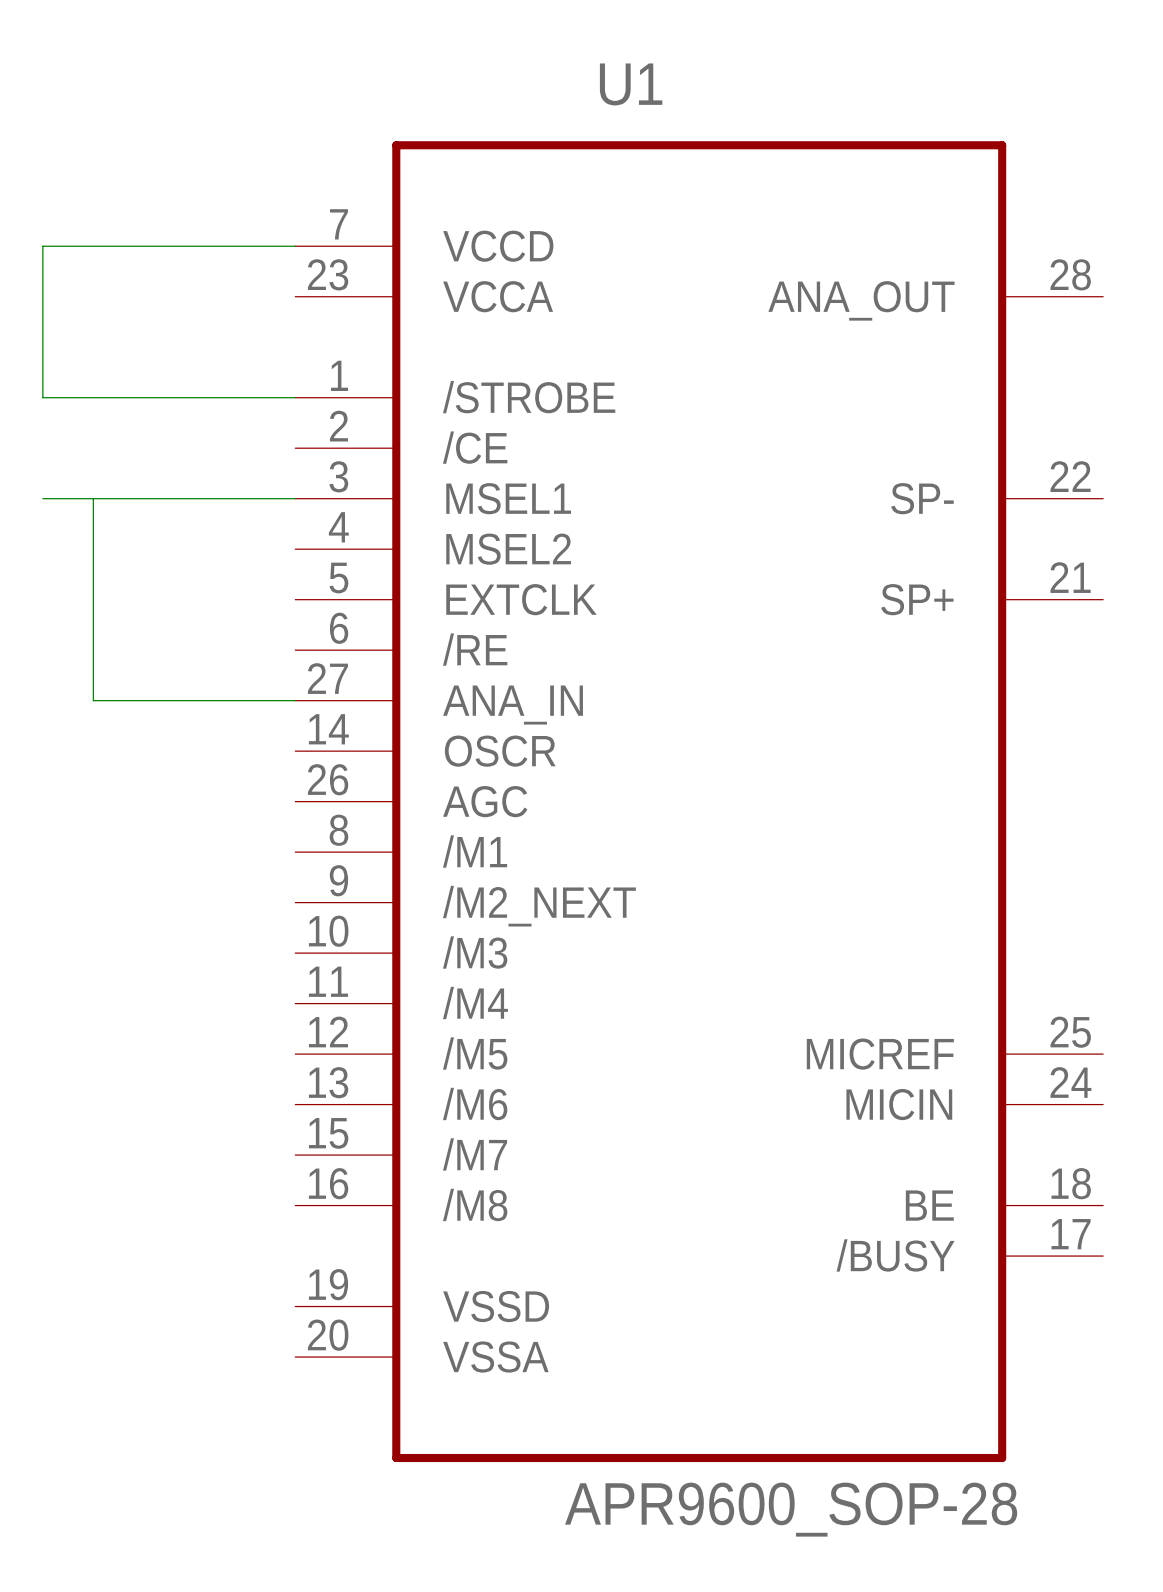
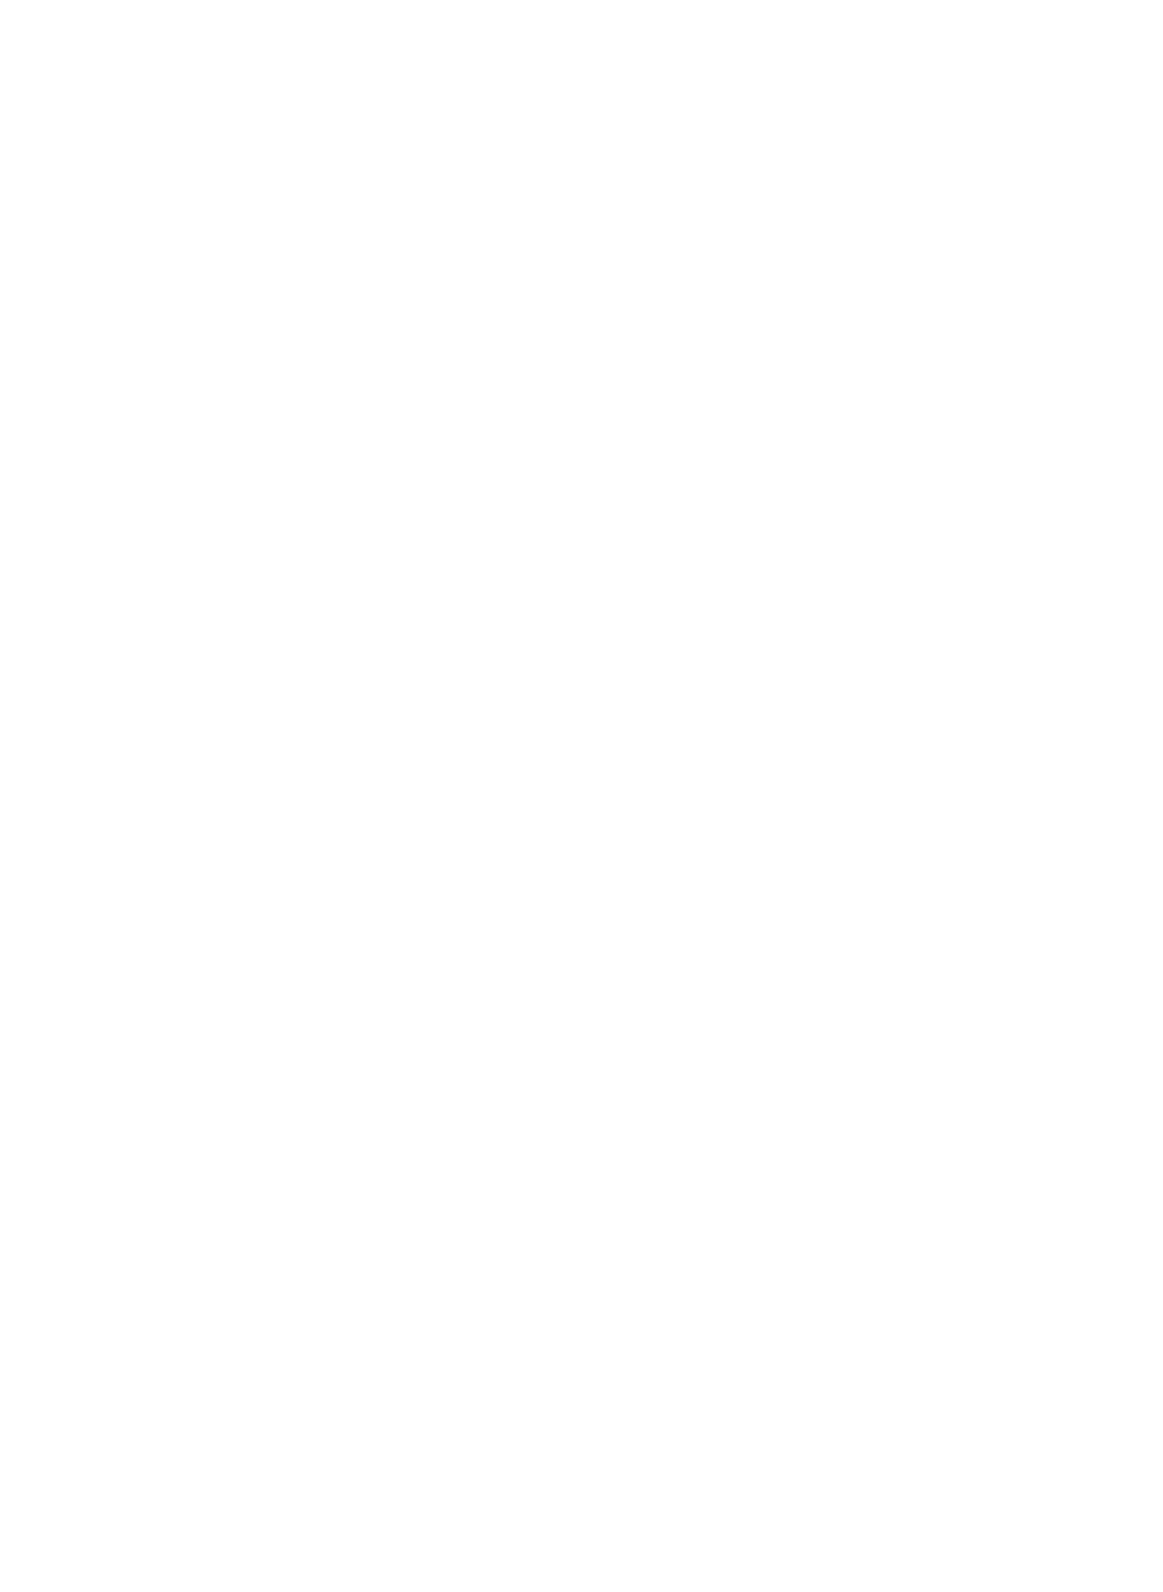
wire: (295, 246) (42, 246) (42, 397) (295, 397) -> none
wire: (42, 498) (295, 498) -> none
wire: (93, 498) (93, 700) (295, 700) -> none
U1: APR9600_SOP-28 (699, 801) -> none

